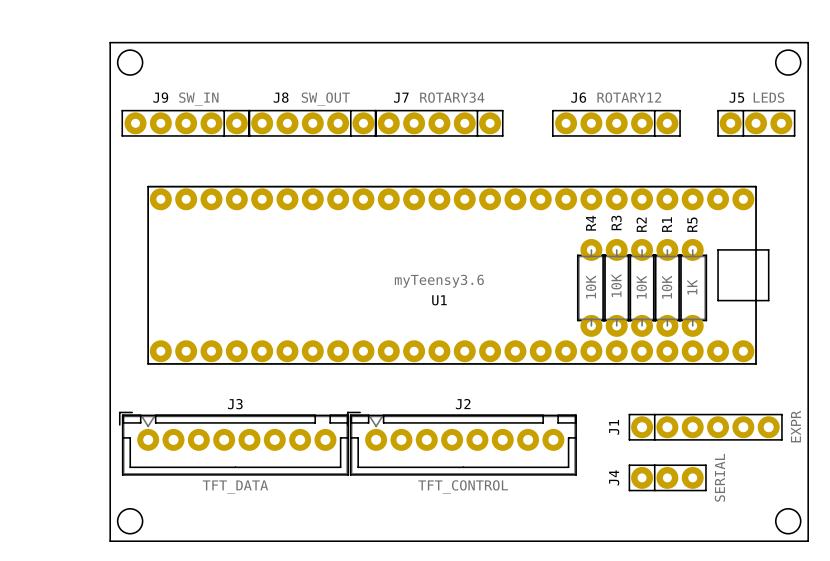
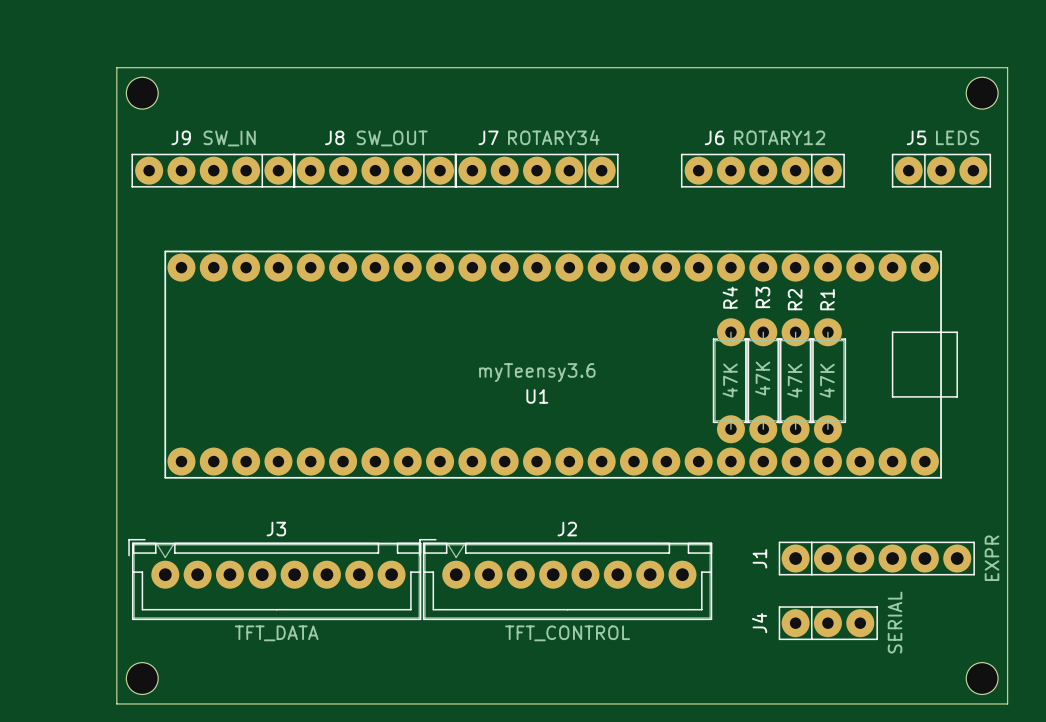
R3 value: 10K (616, 285) -> 47K (762, 378)
R4 value: 10K (591, 286) -> 47K (730, 380)
R2 value: 10K (641, 287) -> 47K (794, 380)
R1 value: 10K (667, 287) -> 47K (827, 380)
R5: 1K (692, 287) -> none

